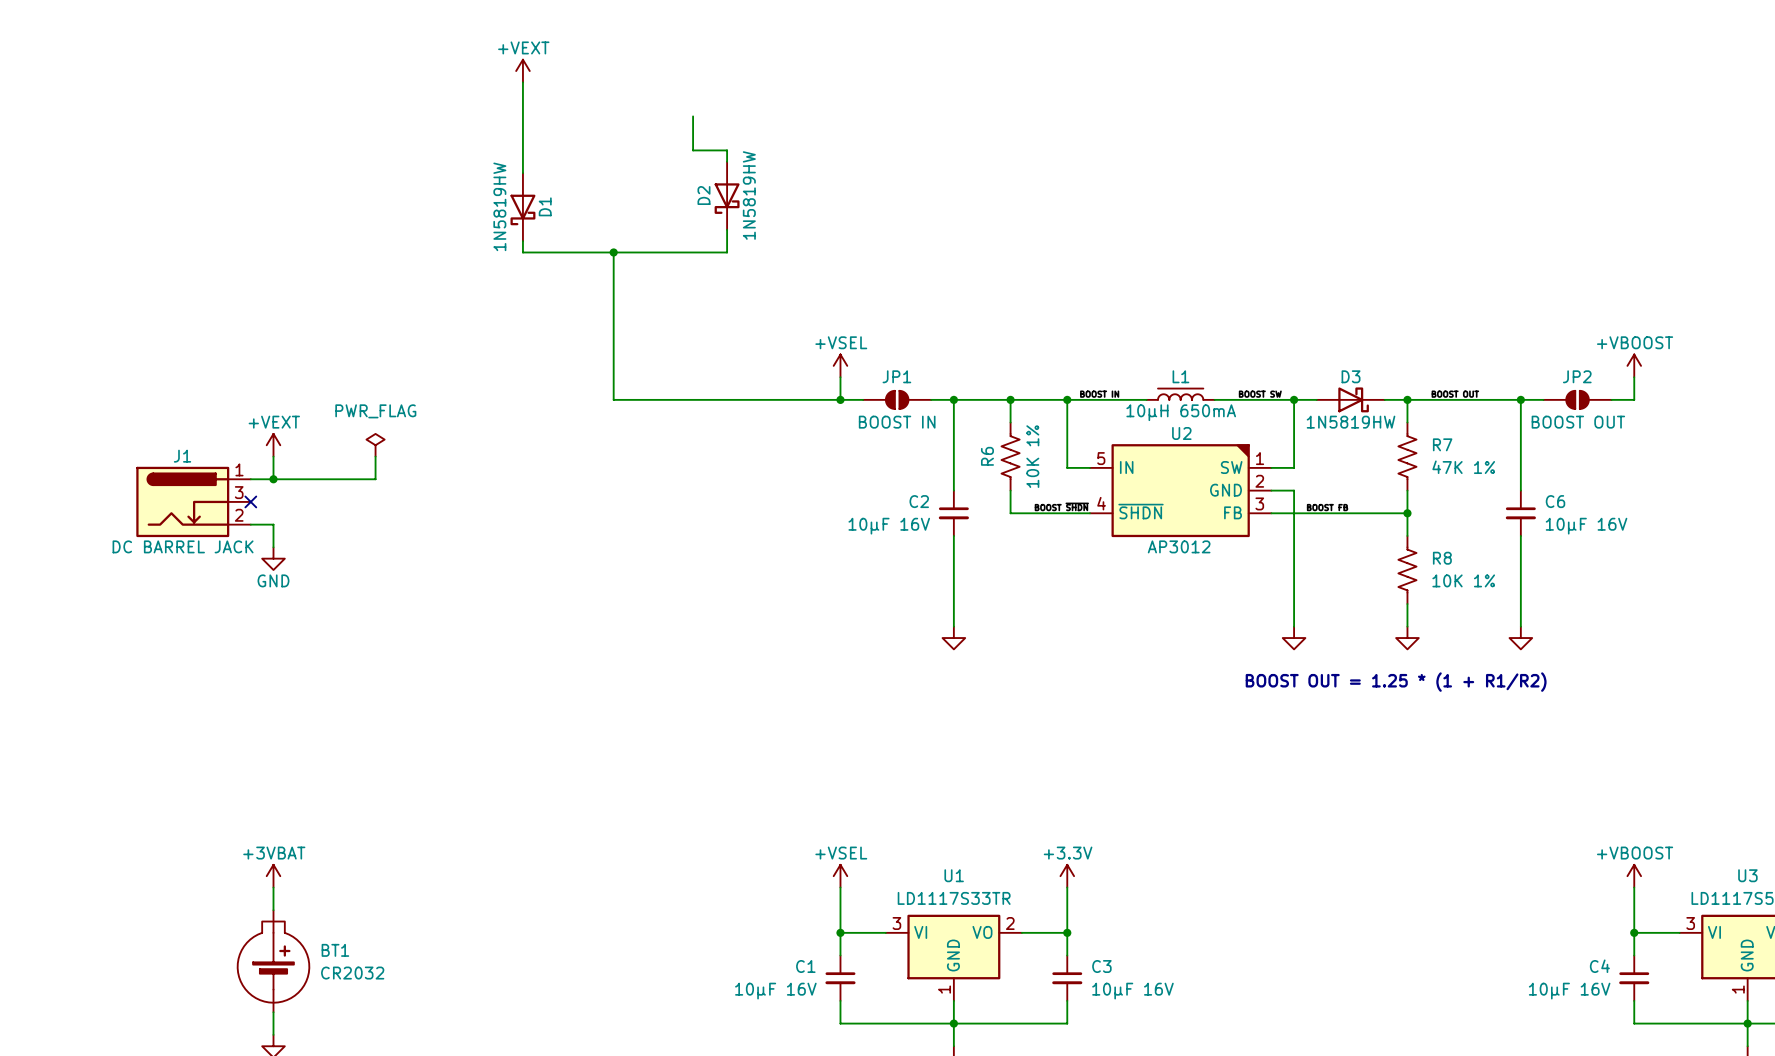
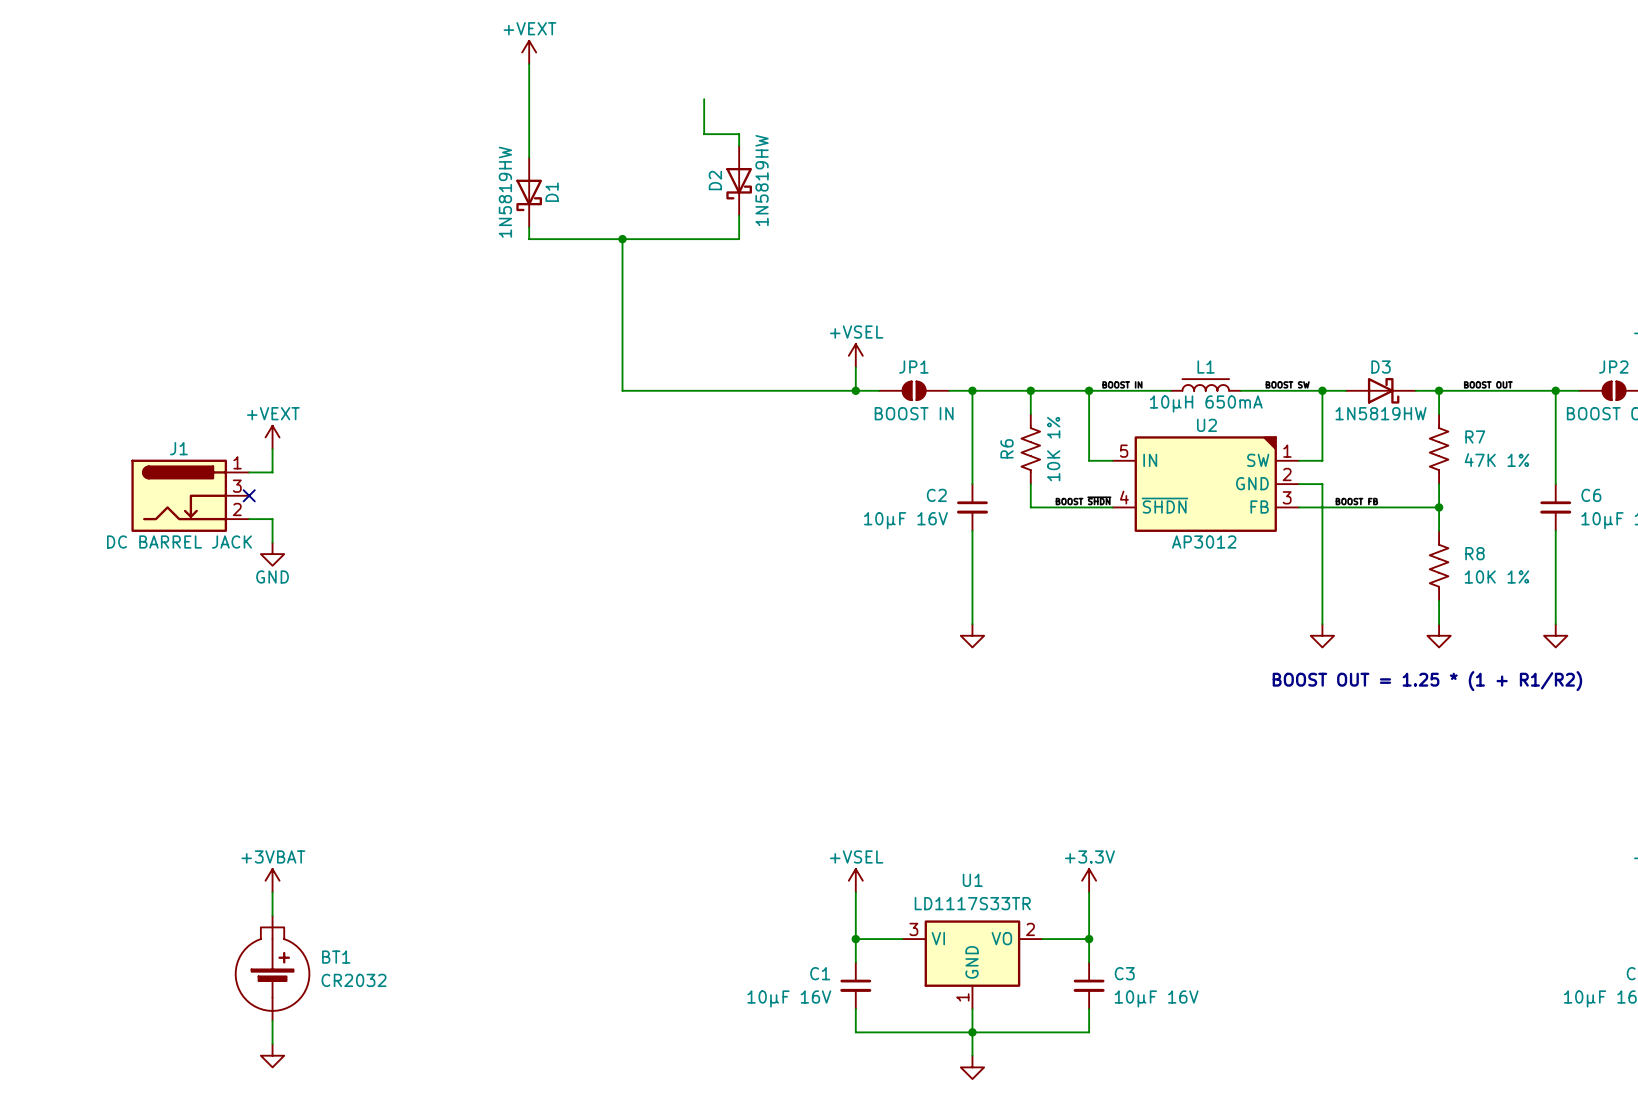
power symbol: PWR_FLAG (375, 445) -> none
wire: (375, 456) (375, 479) (273, 479) -> none
junction: (273, 479) -> none

